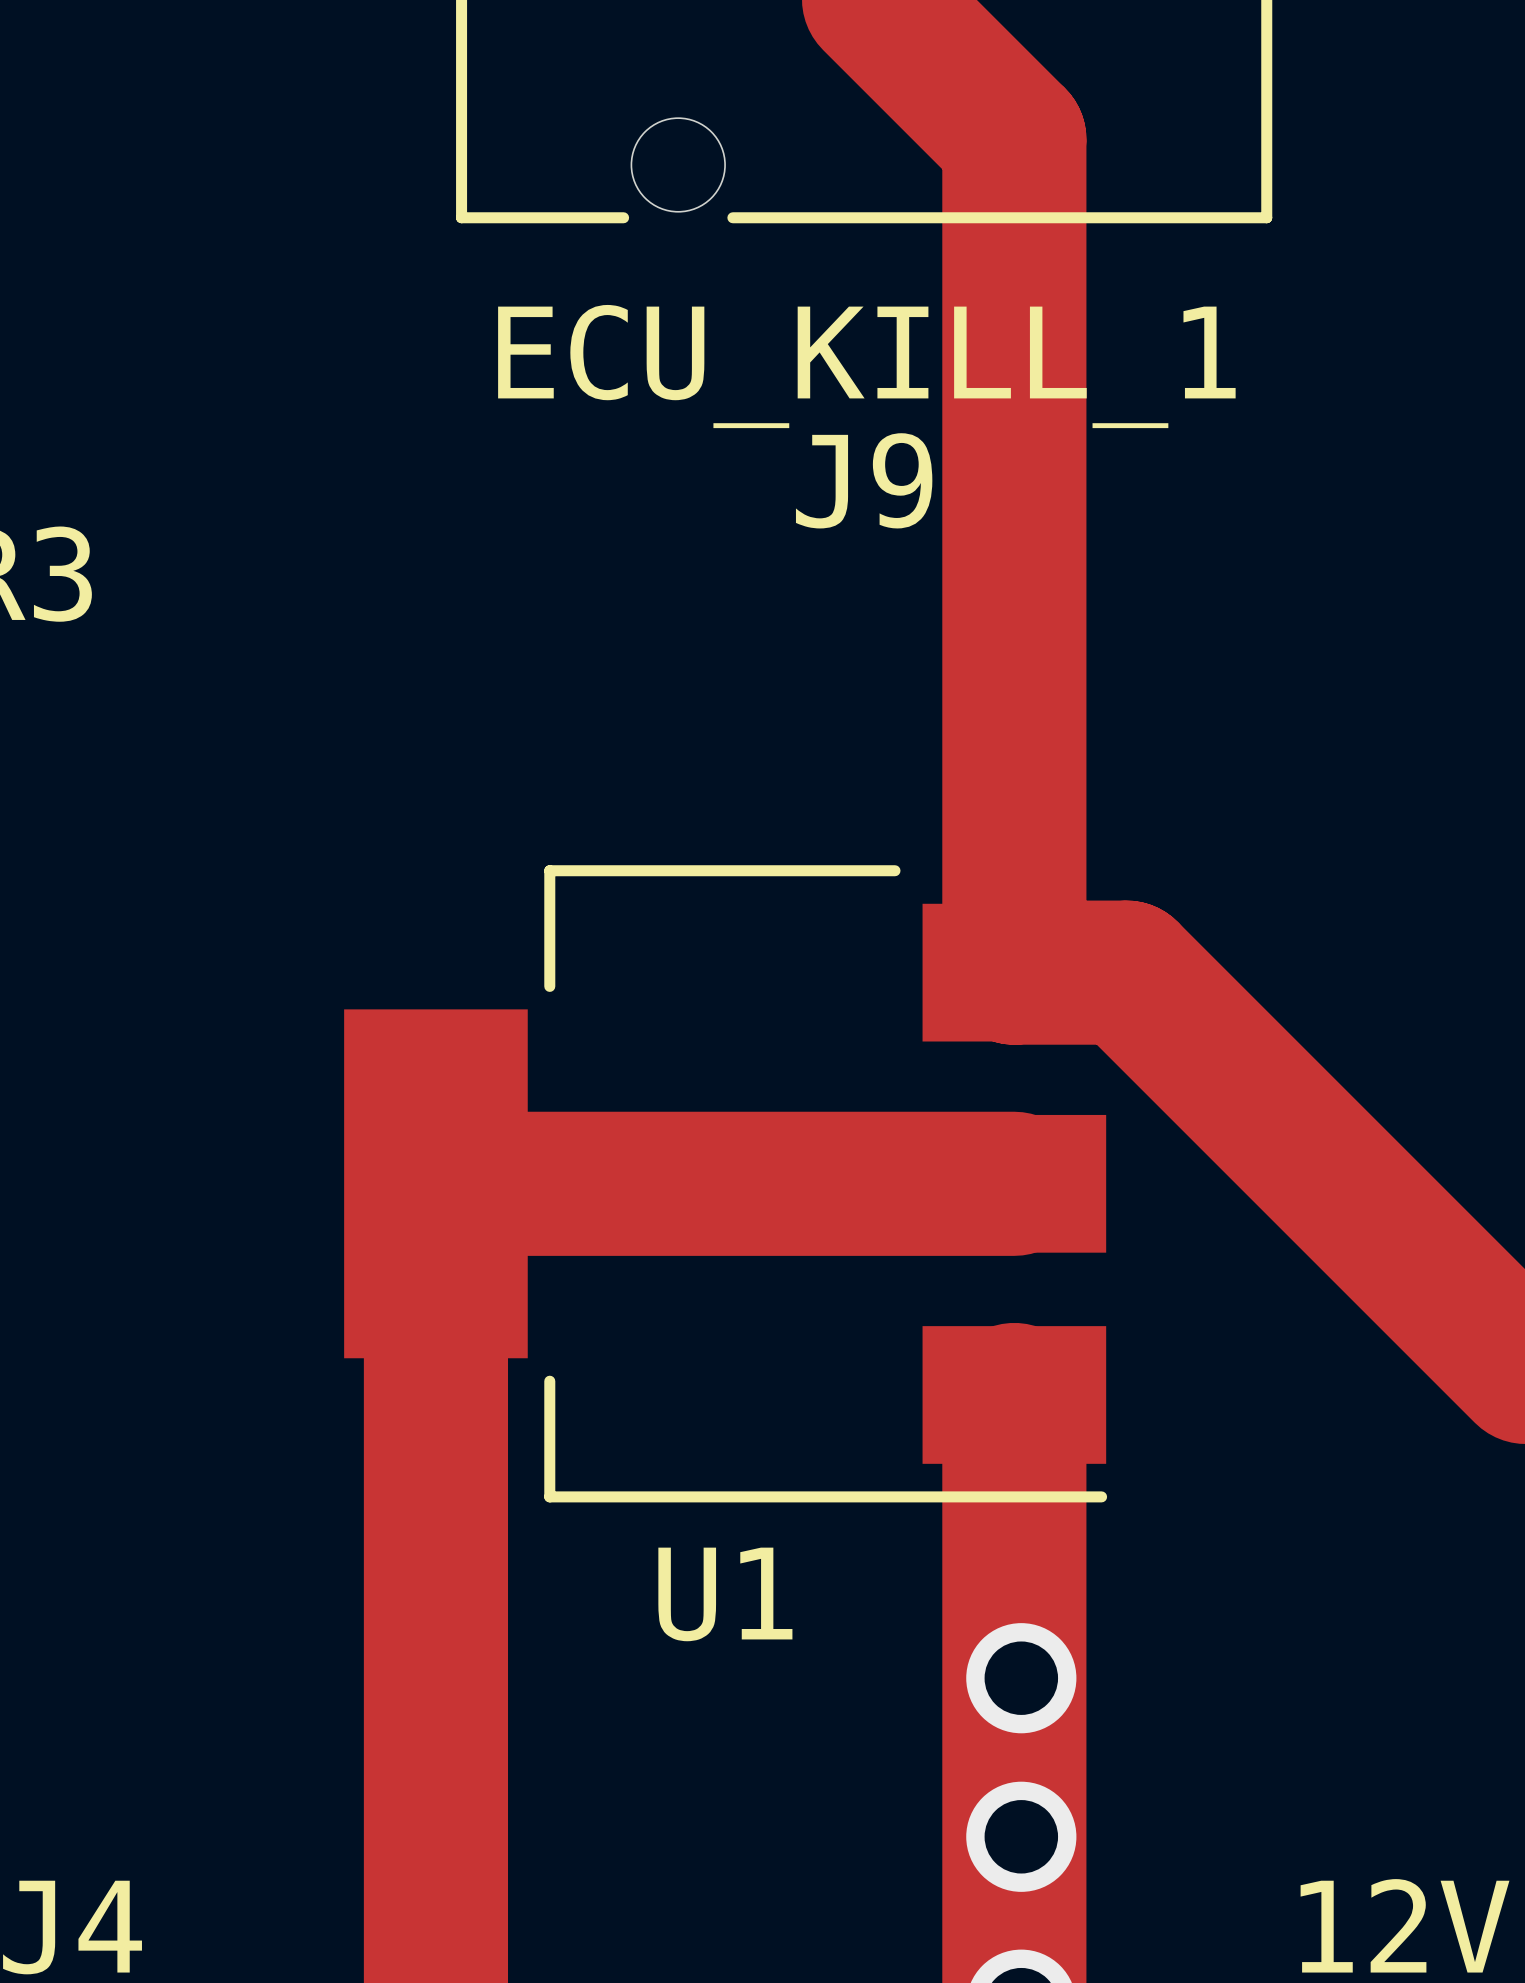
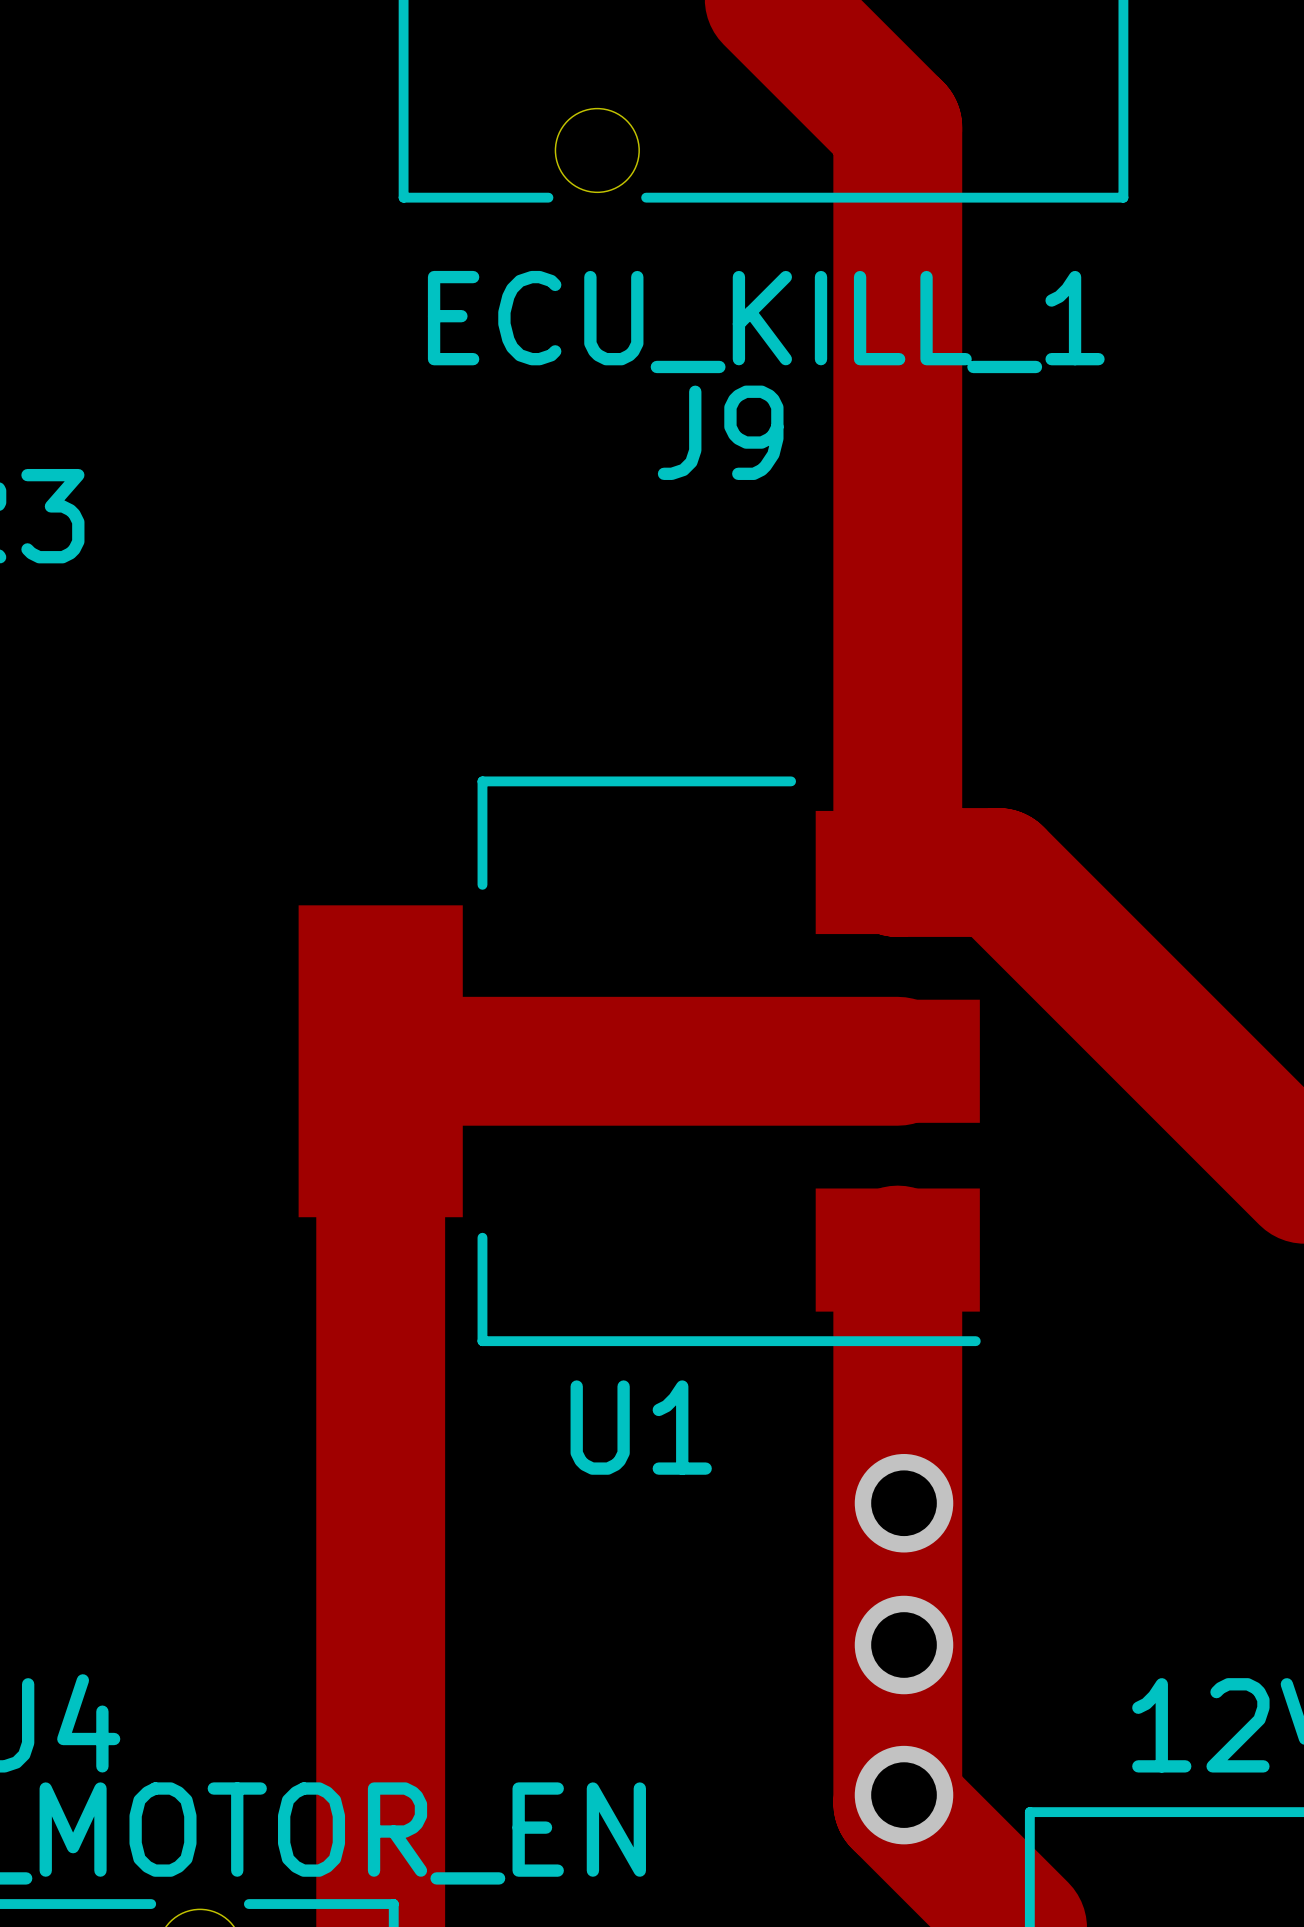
J9 name position: J9 (864, 480) -> J9 (720, 432)

